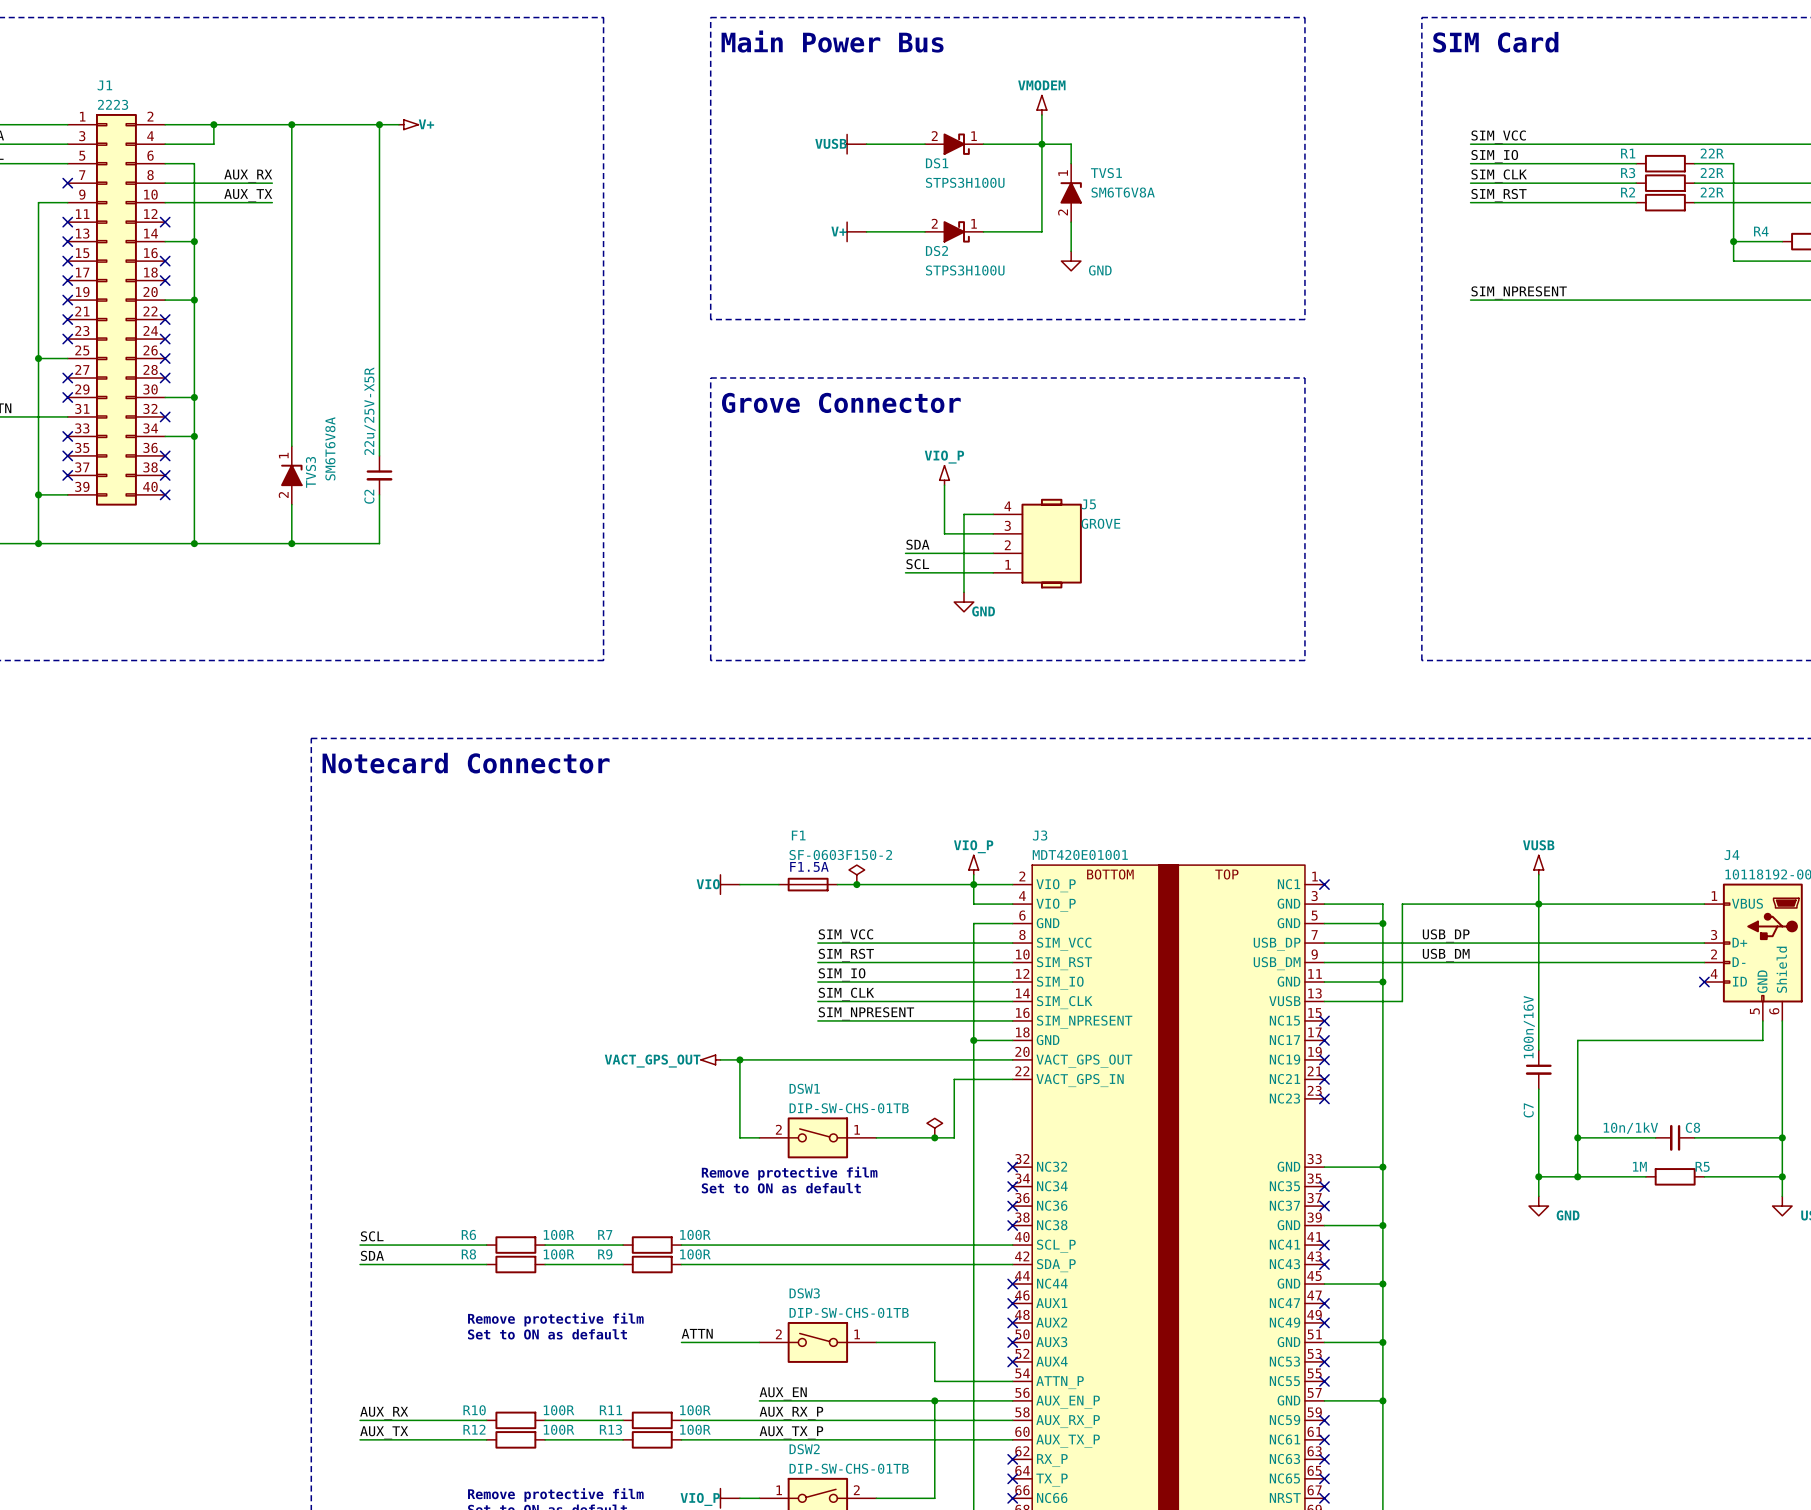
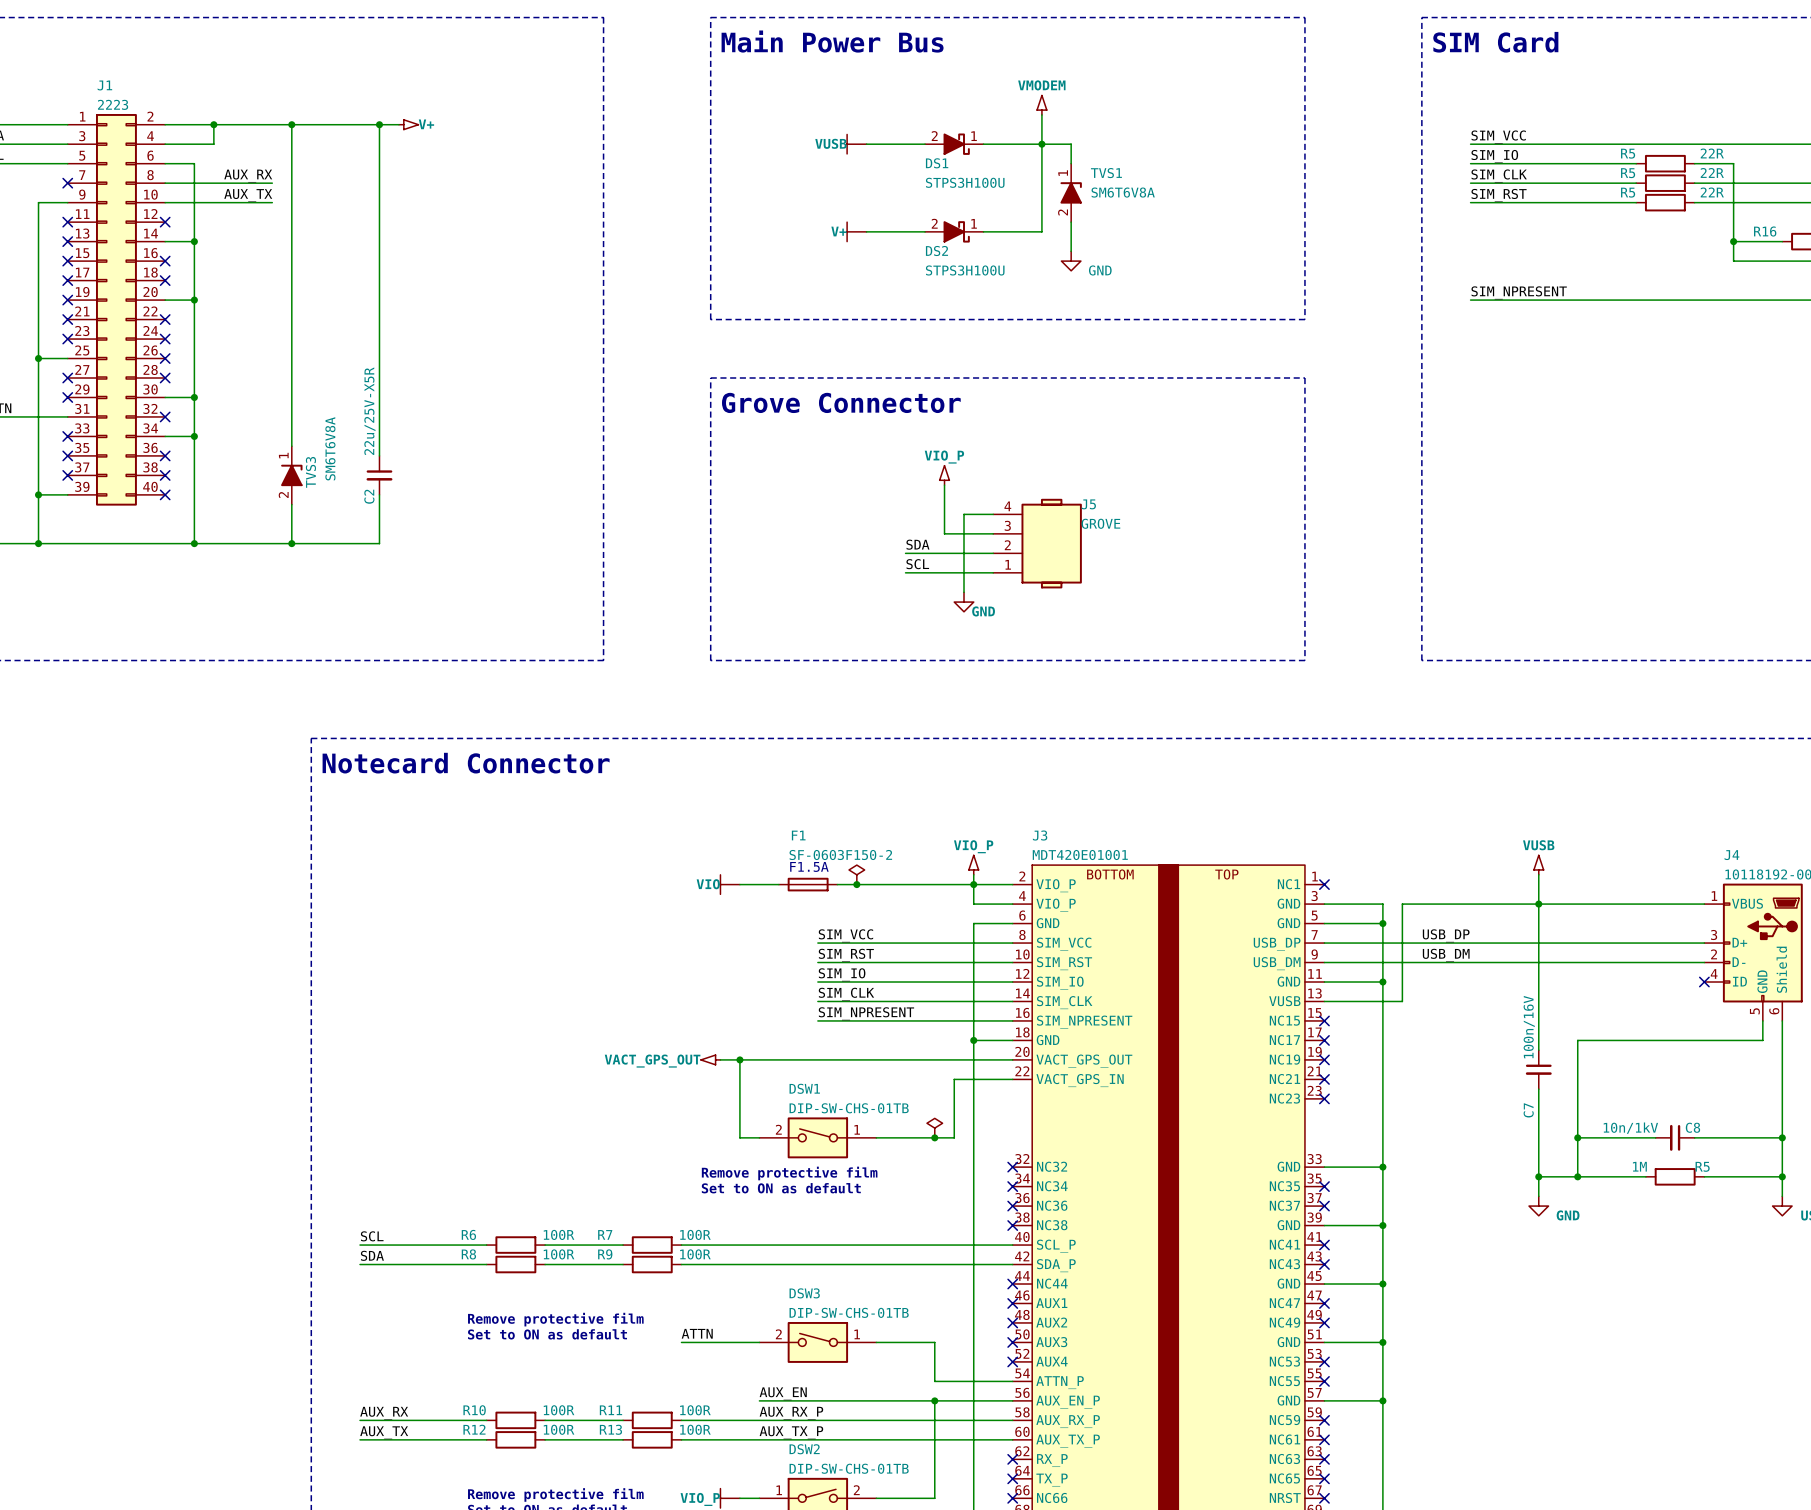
R1 name: R1 (1628, 153) -> R5 (1628, 153)
R3 name: R3 (1628, 173) -> R5 (1628, 173)
R2 name: R2 (1628, 192) -> R5 (1628, 192)
R4 name: R4 (1761, 231) -> R16 (1765, 231)

